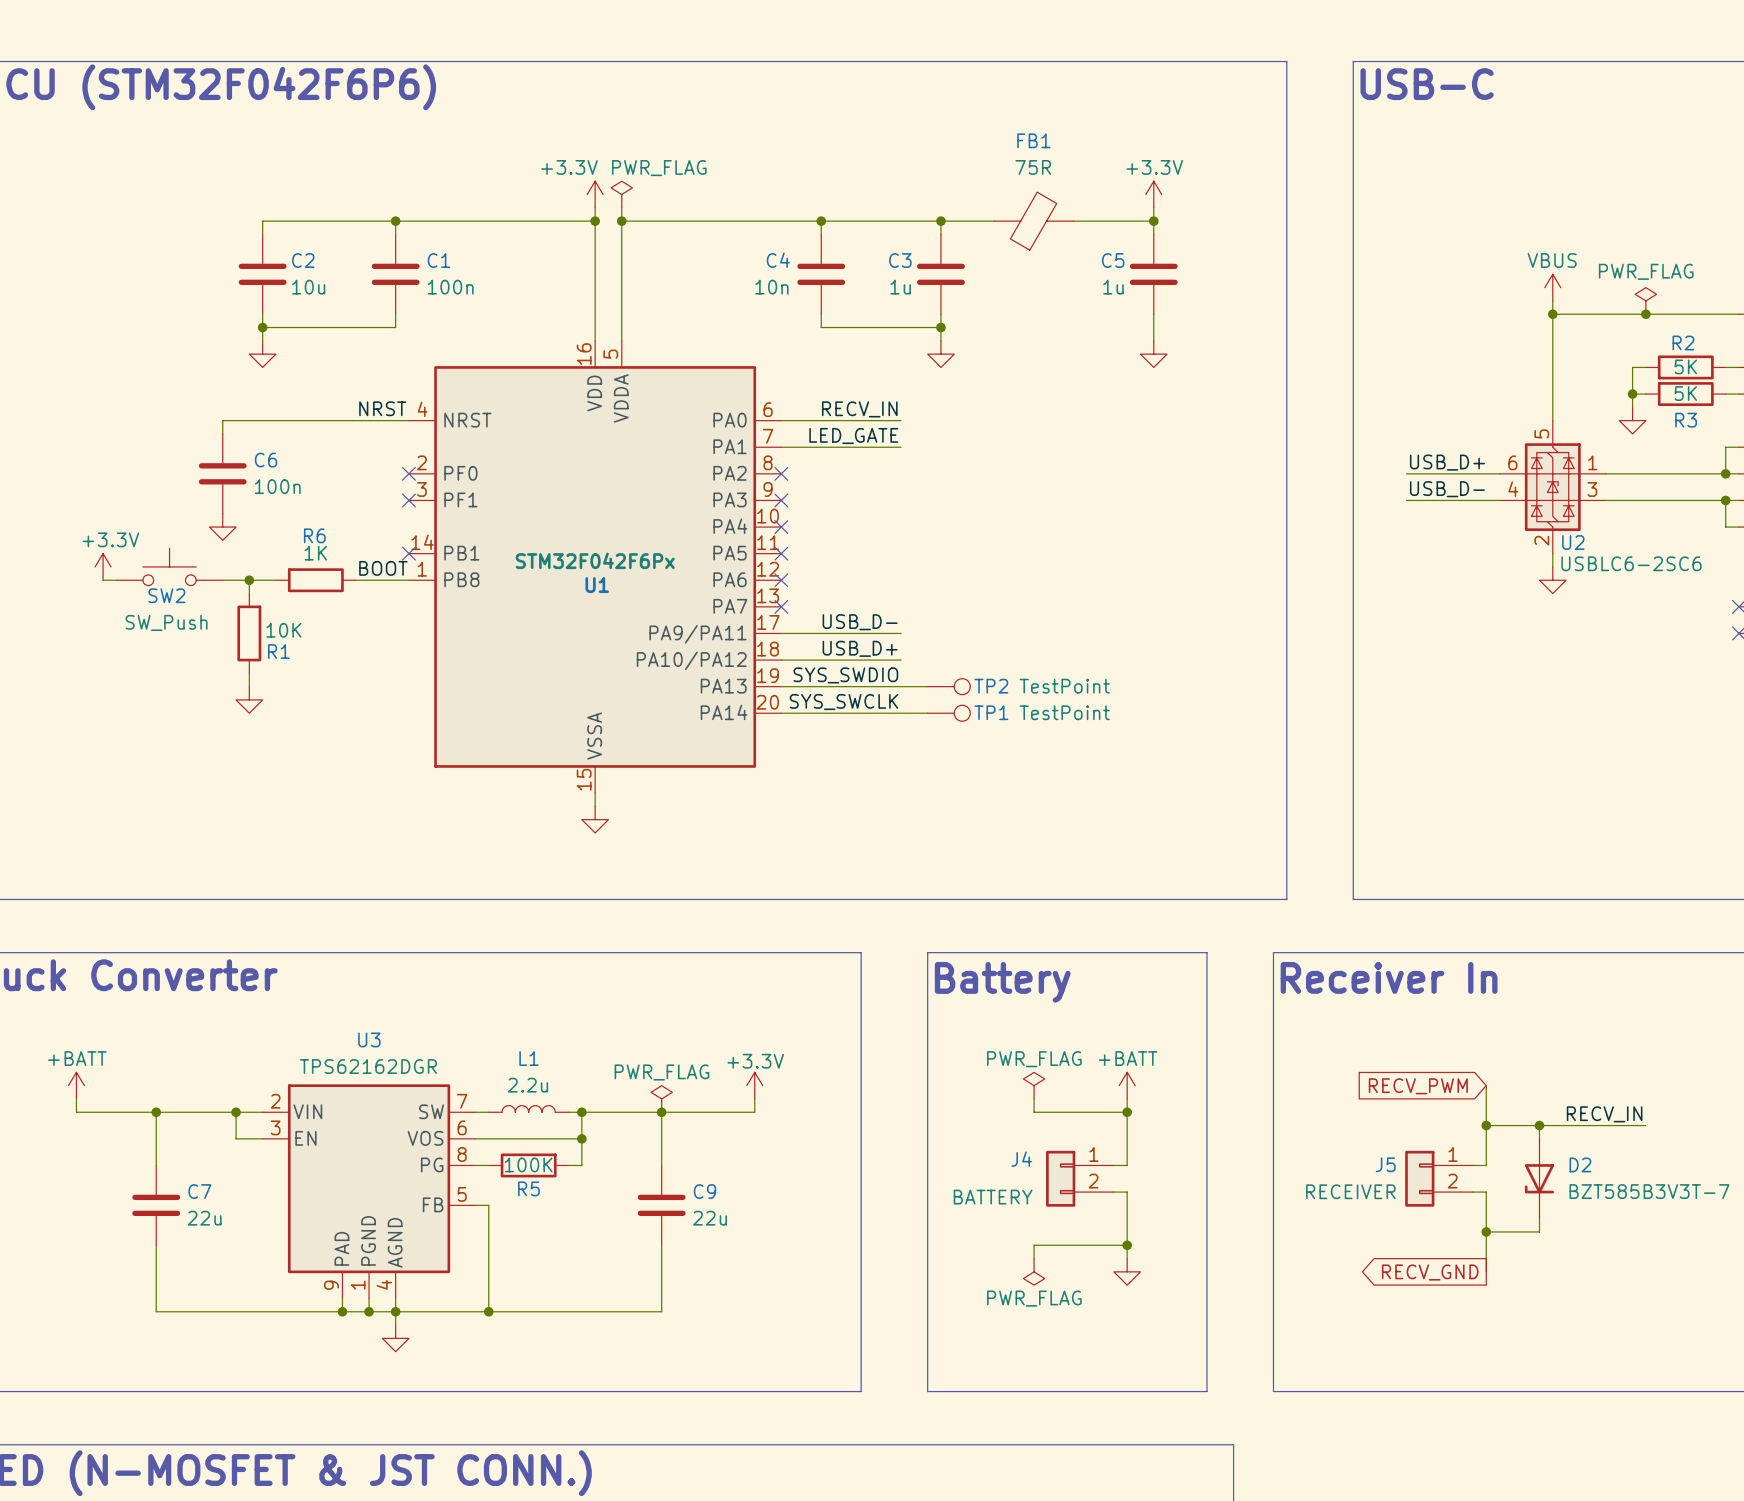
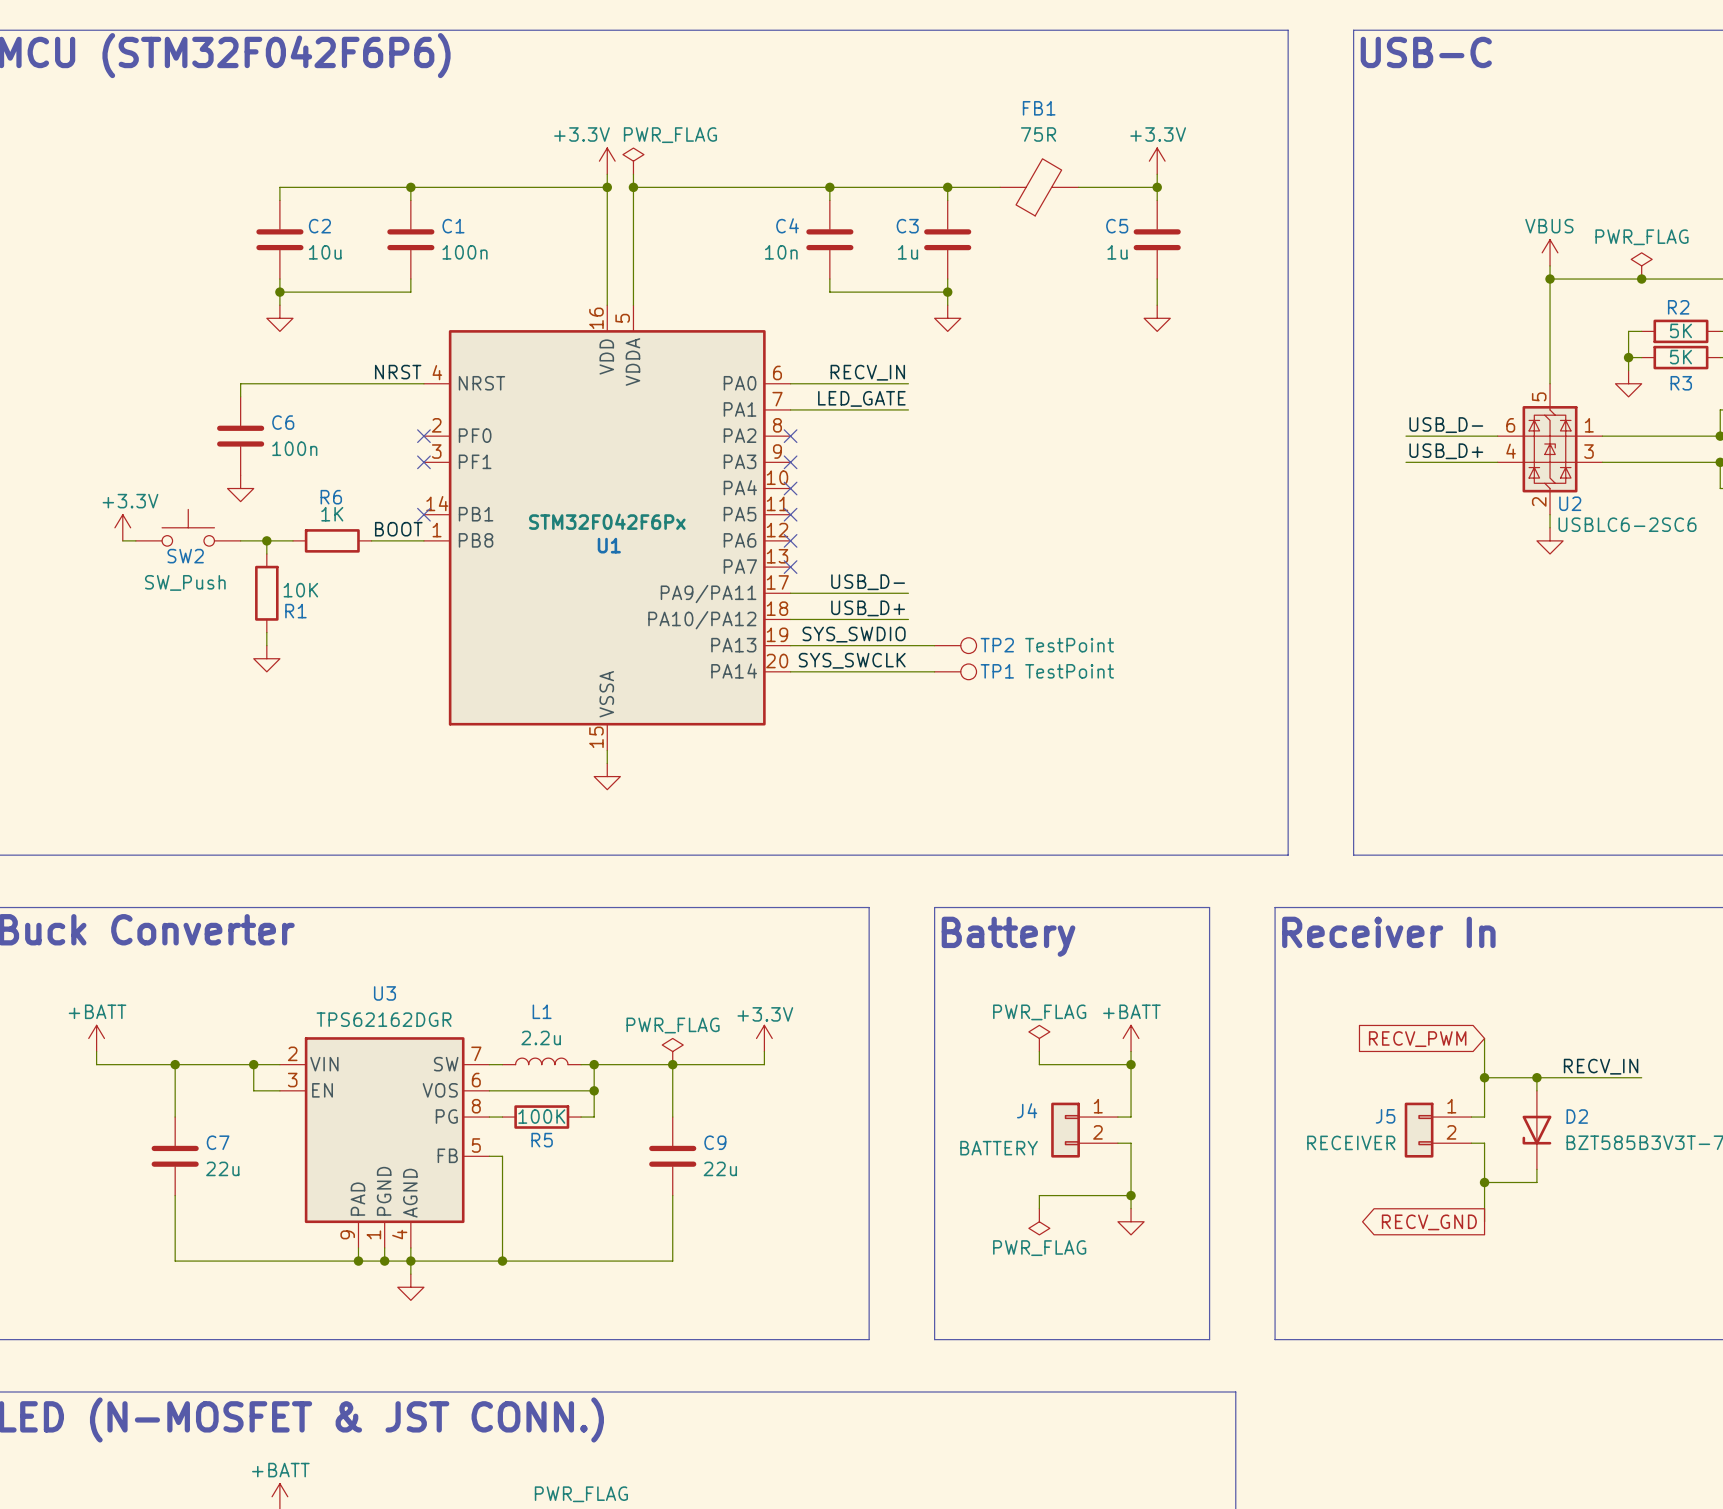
label: USB_D+ (1447, 462) -> USB_D- (1446, 425)
label: USB_D- (1447, 489) -> USB_D+ (1446, 451)

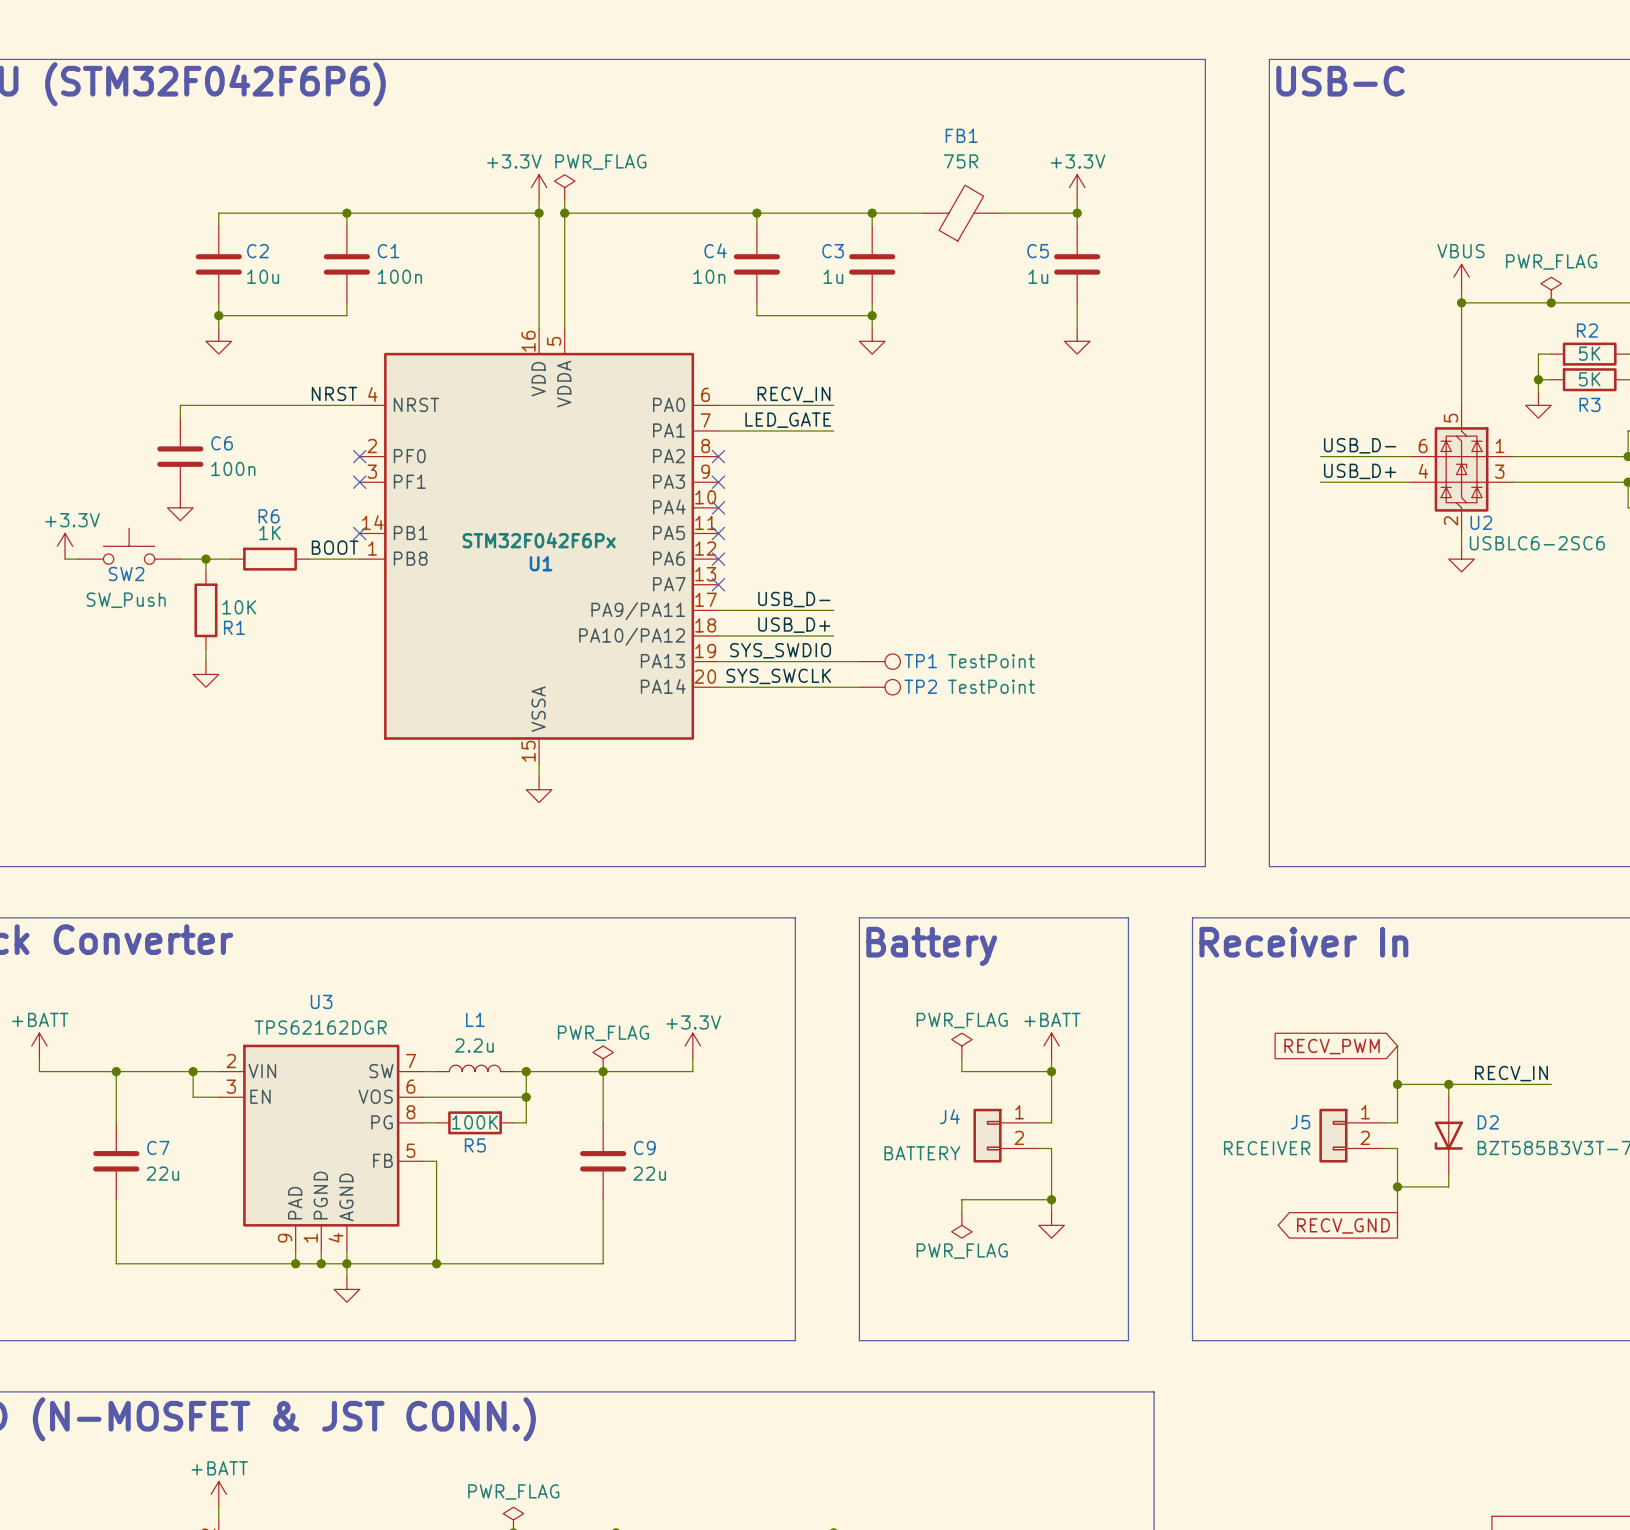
TP2 name: TP2 (997, 645) -> TP1 (920, 661)
TP1 name: TP1 (997, 671) -> TP2 (920, 686)

